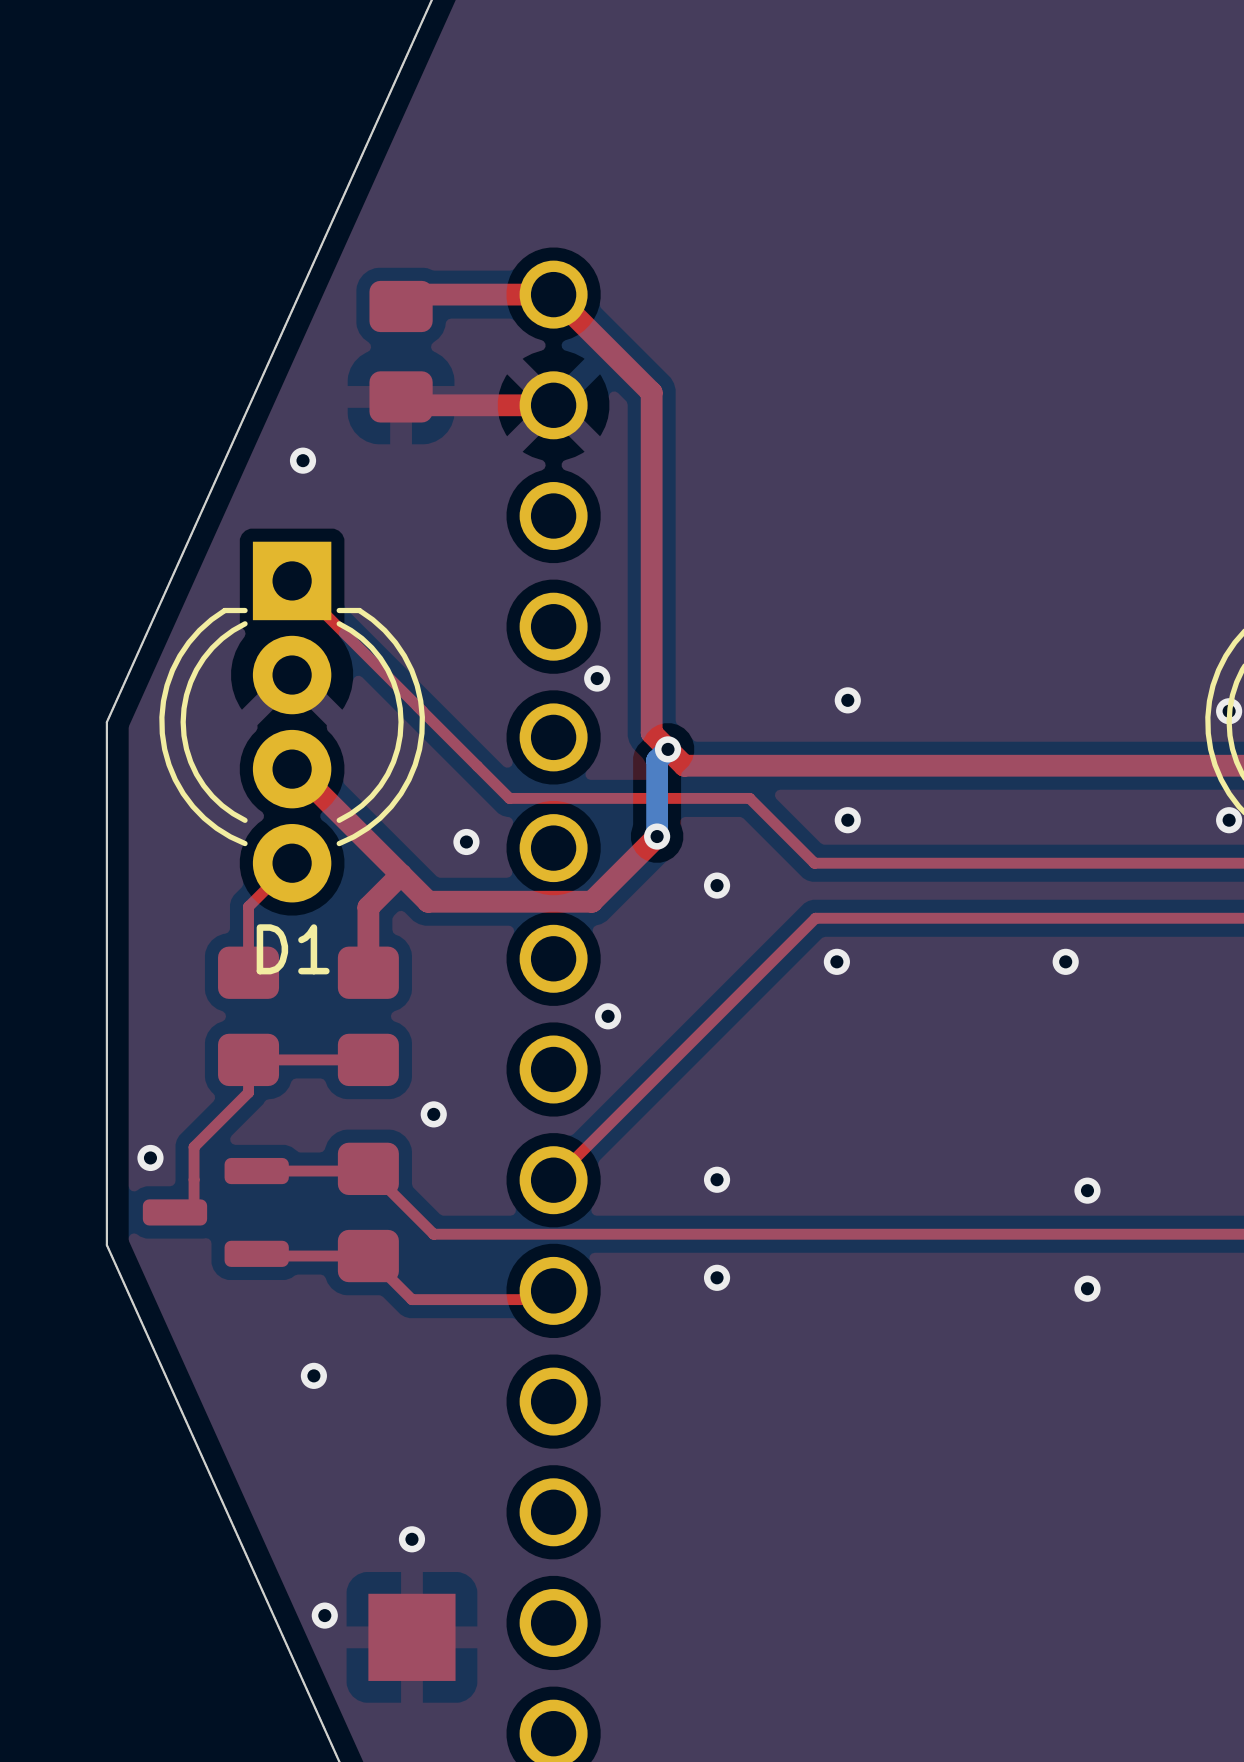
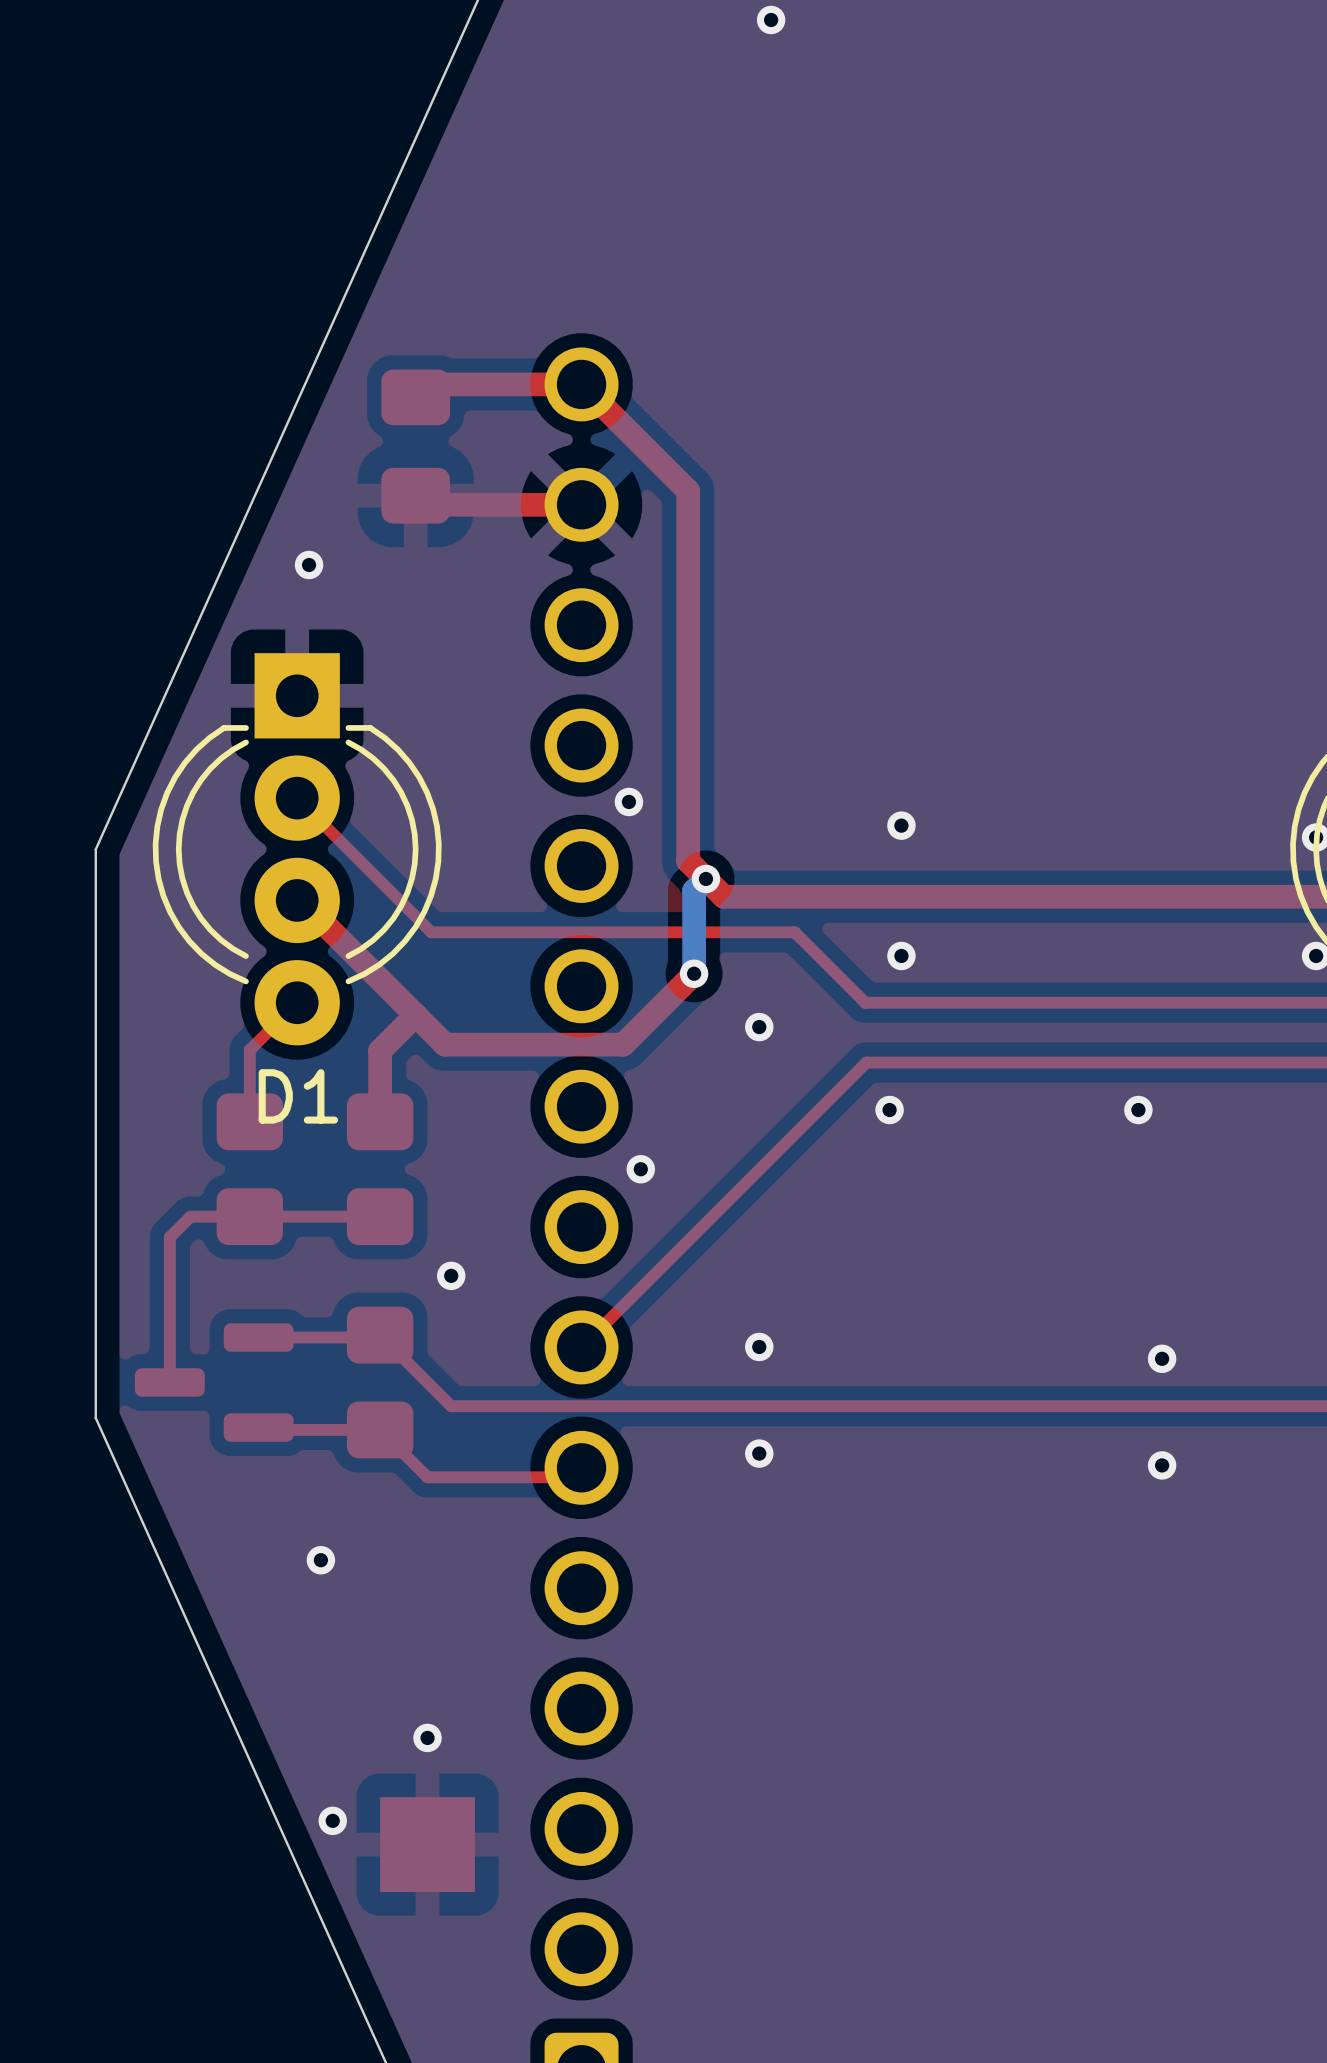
top track: (292, 580) (509, 798) -> (297, 798) (431, 932) (533, 932)
via: (466, 841) -> none
top track: (248, 1059) (248, 1092) (194, 1147) (194, 1212) -> (249, 1216) (190, 1216) (169, 1237) (169, 1382)
via: (150, 1157) -> none

